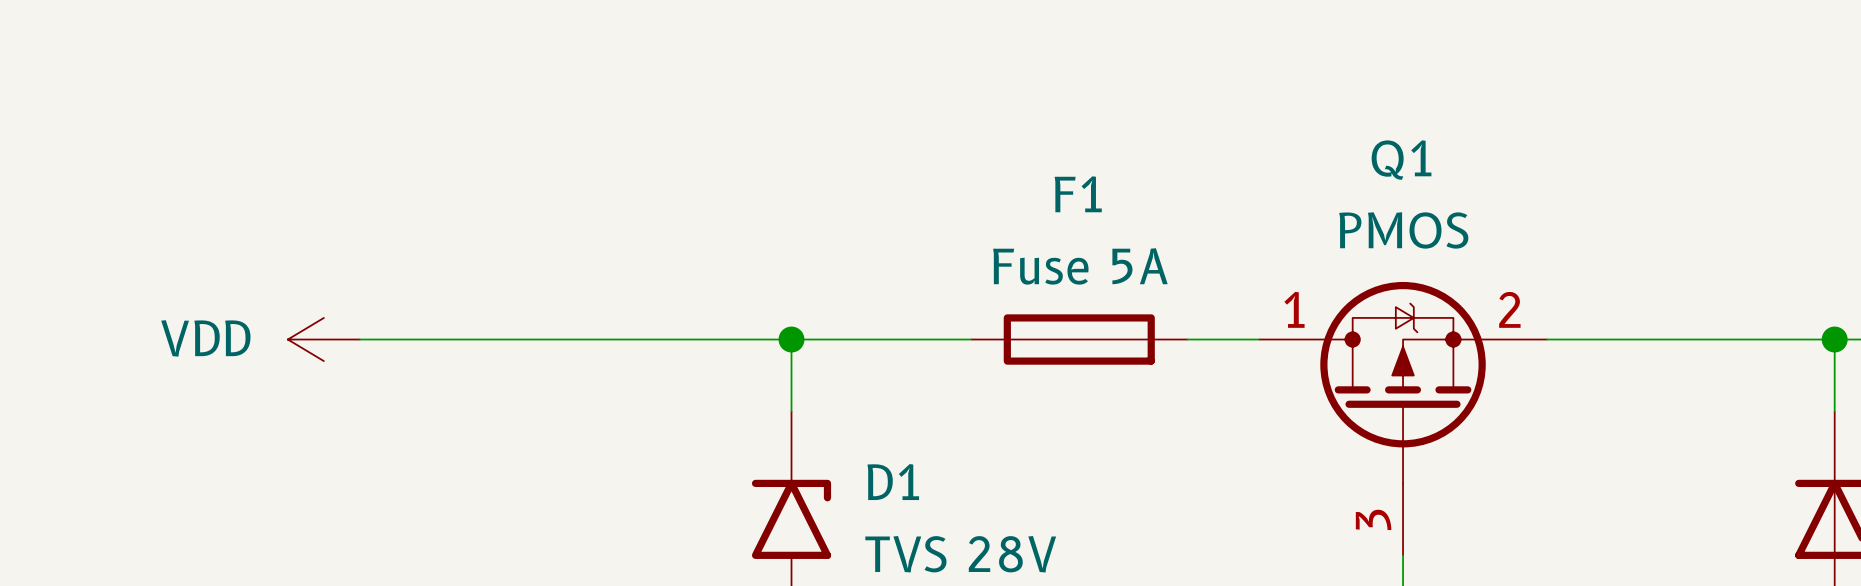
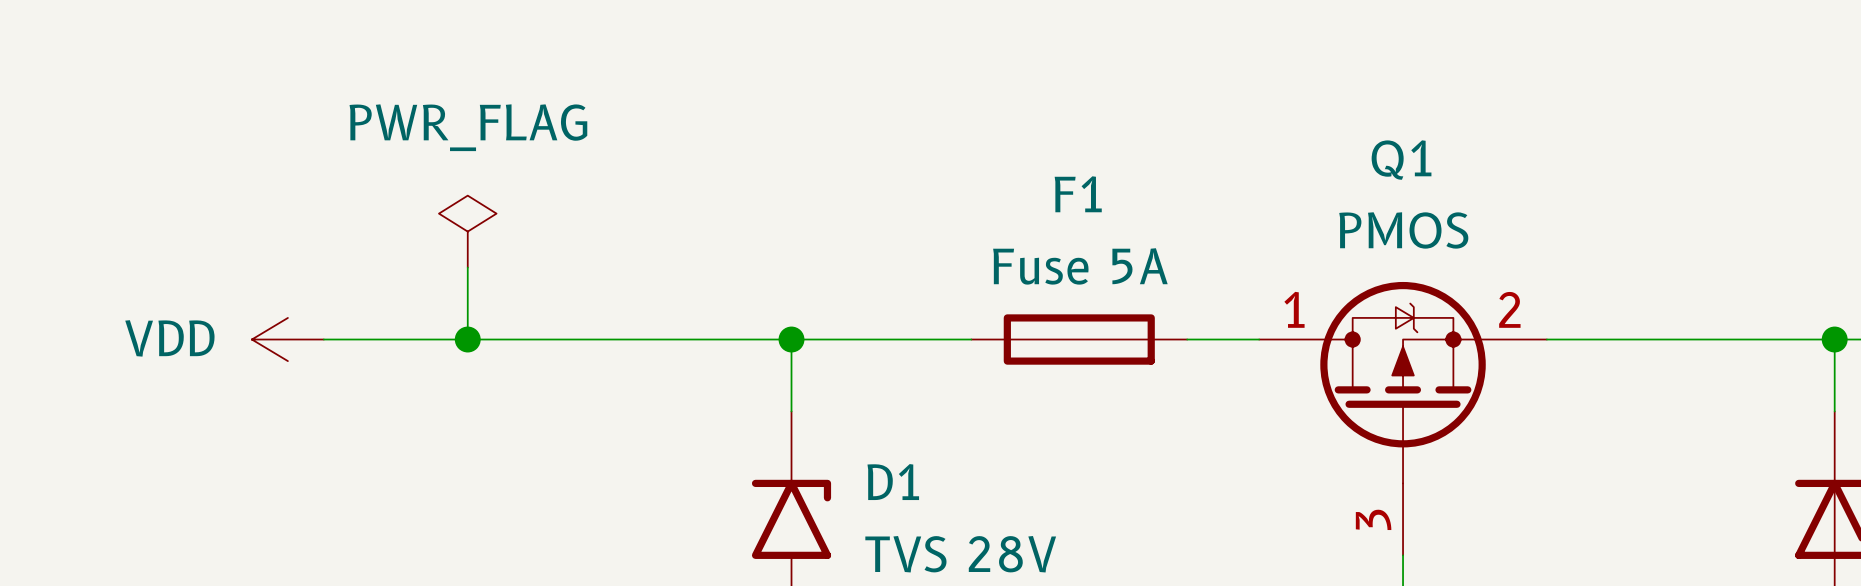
power symbol: none -> PWR_FLAG (467, 231)
wire: none -> (467, 267) (467, 339)
power symbol position: VDD (323, 339) -> VDD (287, 339)
junction: none -> (467, 339)

